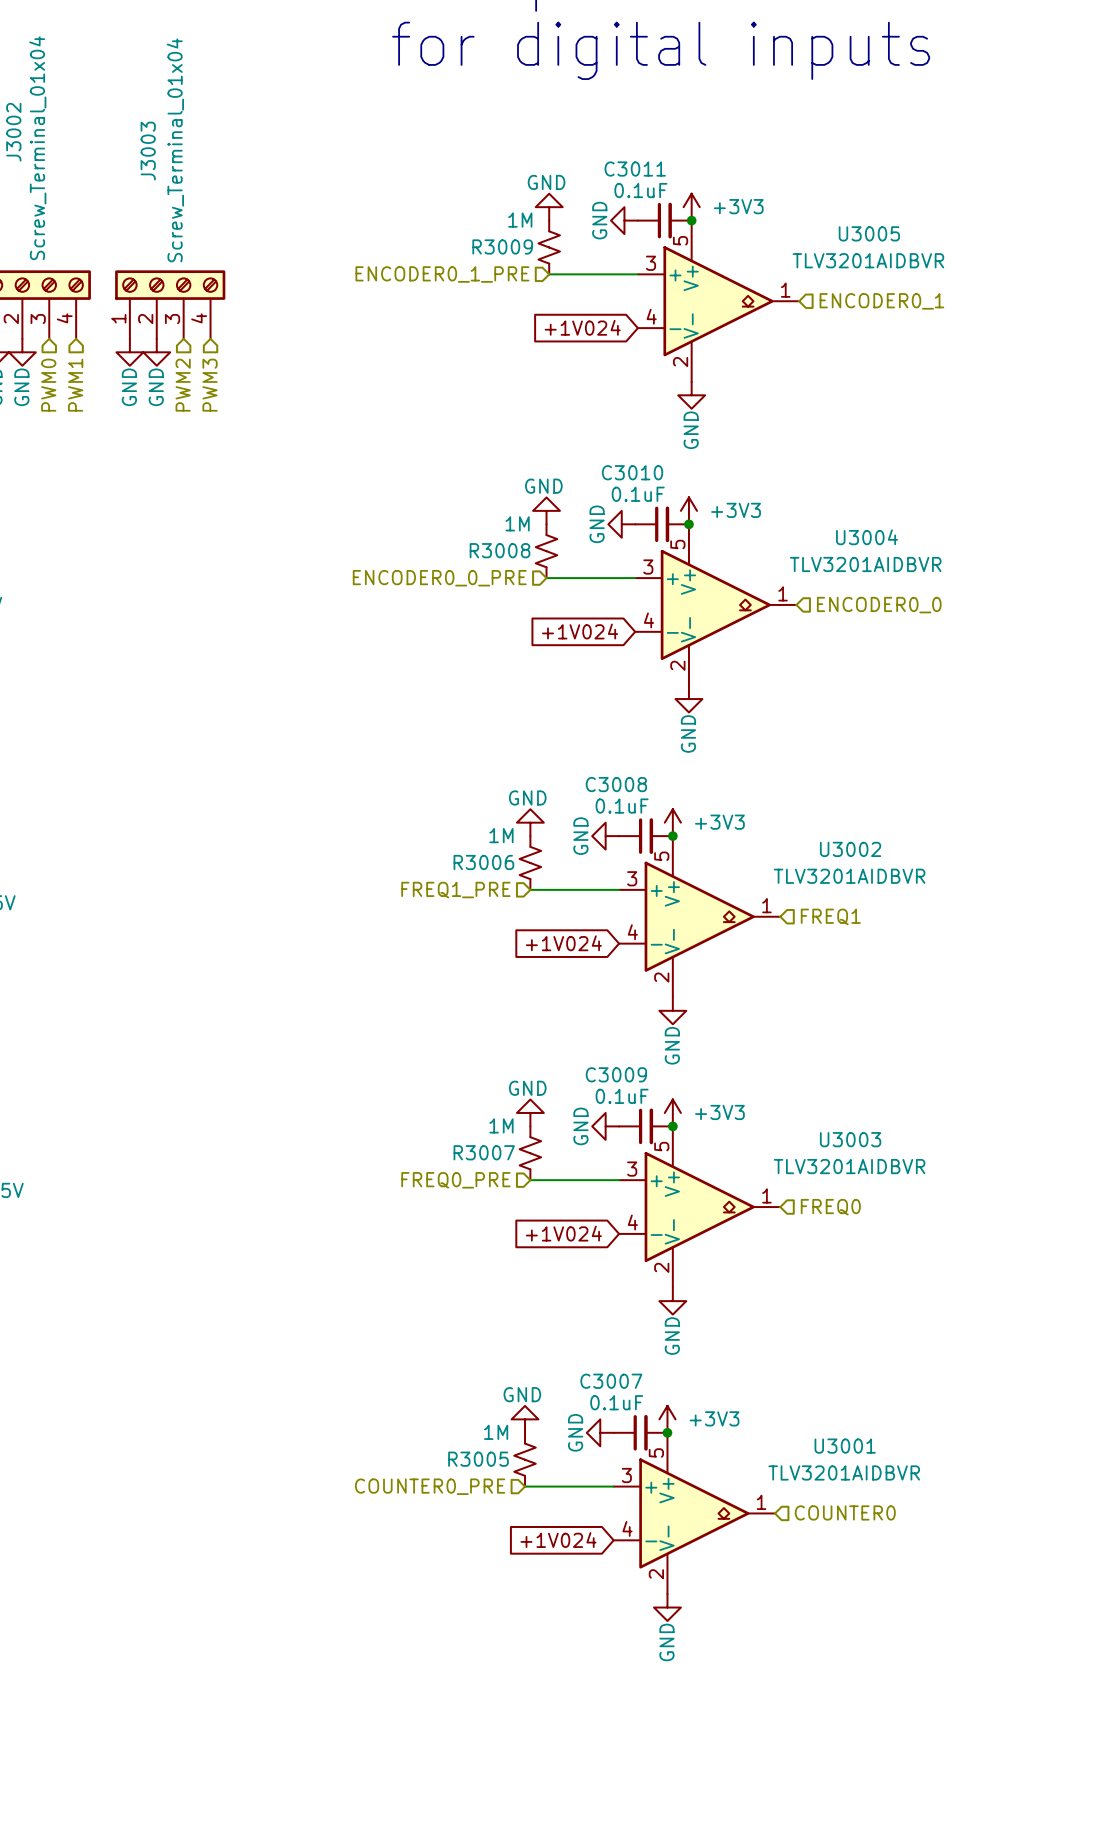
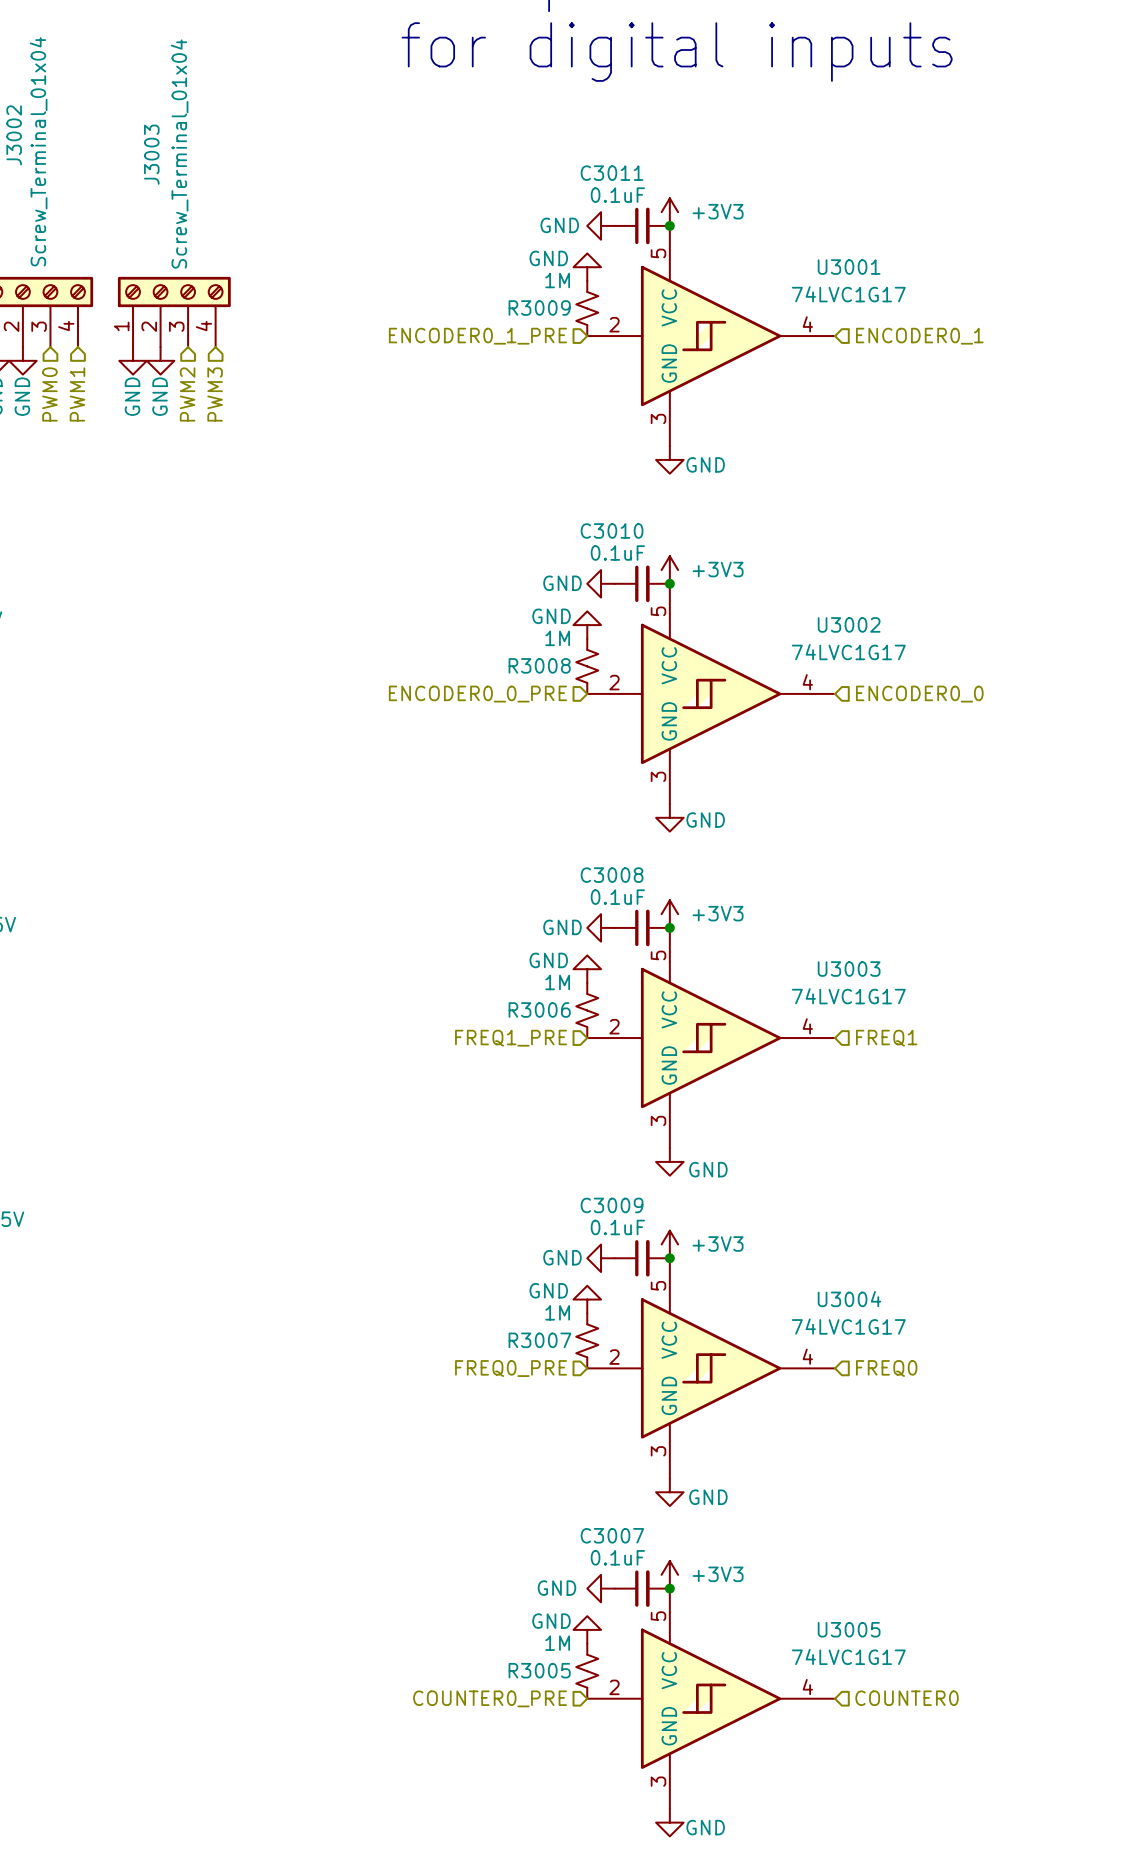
power symbol: GND (549, 207) -> none
power symbol position: +3V3 (691, 207) -> +3V3 (669, 212)
power symbol: none -> GND (601, 225)
power symbol: GND (624, 220) -> none
U3005 symbol: [637, 220, 800, 382] -> [587, 1588, 836, 1809]
C3011 position: (664, 220) -> (642, 225)
junction position: (691, 220) -> (669, 225)
R3009 position: (549, 247) -> (587, 308)
power symbol: none -> GND (587, 267)
U3005 value: TLV3201AIDBVR (868, 260) -> 74LVC1G17 (848, 1656)
hierarchical label position: ENCODER0_1_PRE (442, 274) -> ENCODER0_1_PRE (477, 336)
wire: (549, 274) (637, 274) -> none
hierarchical label position: ENCODER0_1 (881, 301) -> ENCODER0_1 (919, 336)
global label: +1V024 (582, 327) -> none
power symbol: GND (691, 395) -> none
power symbol: none -> GND (669, 459)
power symbol: GND (546, 510) -> none
power symbol position: +3V3 (688, 510) -> +3V3 (669, 570)
power symbol: GND (621, 524) -> none
U3004 symbol: [635, 524, 797, 686] -> [587, 1258, 836, 1479]
C3010 position: (662, 524) -> (642, 583)
junction position: (688, 524) -> (669, 583)
R3008 position: (546, 551) -> (587, 666)
U3004 value: TLV3201AIDBVR (865, 564) -> 74LVC1G17 (848, 1326)
power symbol: none -> GND (601, 583)
hierarchical label position: ENCODER0_0_PRE (439, 578) -> ENCODER0_0_PRE (477, 694)
wire: (546, 578) (635, 578) -> none
hierarchical label position: ENCODER0_0 (879, 605) -> ENCODER0_0 (919, 694)
power symbol: none -> GND (587, 625)
global label: +1V024 (579, 631) -> none
power symbol: GND (688, 699) -> none
power symbol: none -> GND (669, 817)
power symbol: GND (530, 822) -> none
power symbol position: +3V3 (672, 822) -> +3V3 (669, 914)
power symbol: GND (605, 836) -> none
U3002 symbol: [619, 836, 781, 998] -> [587, 583, 836, 805]
C3008 position: (645, 836) -> (642, 927)
junction: (672, 836) -> none
R3006 position: (530, 862) -> (587, 1010)
U3002 value: TLV3201AIDBVR (849, 876) -> 74LVC1G17 (848, 652)
wire: (530, 889) (619, 889) -> none
hierarchical label position: FREQ1_PRE (455, 890) -> FREQ1_PRE (511, 1038)
power symbol: none -> GND (601, 927)
junction: none -> (669, 927)
hierarchical label position: FREQ1 (830, 916) -> FREQ1 (886, 1038)
global label: +1V024 (563, 943) -> none
power symbol: none -> GND (587, 969)
power symbol: GND (672, 1010) -> none
power symbol: GND (530, 1112) -> none
power symbol: +3V3 (672, 1112) -> none
power symbol text position: GND (580, 1126) -> GND (708, 1169)
power symbol rotation: 0° (605, 1126) -> 90° counterclockwise (669, 1161)
power symbol position: GND (605, 1126) -> GND (669, 1161)
U3003 symbol: [619, 1126, 781, 1288] -> [587, 927, 836, 1149]
C3009 position: (645, 1126) -> (642, 1258)
junction: (672, 1126) -> none
R3007 position: (530, 1153) -> (587, 1340)
U3003 value: TLV3201AIDBVR (849, 1166) -> 74LVC1G17 (848, 996)
hierarchical label position: FREQ0_PRE (455, 1180) -> FREQ0_PRE (511, 1368)
wire: (530, 1180) (619, 1180) -> none
hierarchical label position: FREQ0 (830, 1207) -> FREQ0 (886, 1368)
power symbol: none -> +3V3 (669, 1244)
power symbol: none -> GND (601, 1258)
junction: none -> (669, 1258)
global label: +1V024 (563, 1233) -> none
power symbol: none -> GND (587, 1299)
power symbol: GND (672, 1301) -> none
power symbol: GND (525, 1419) -> none
power symbol: +3V3 (667, 1419) -> none
power symbol text position: GND (575, 1432) -> GND (708, 1497)
power symbol rotation: 0° (600, 1432) -> 90° counterclockwise (669, 1492)
power symbol position: GND (600, 1432) -> GND (669, 1492)
U3001 symbol: [613, 1432, 775, 1595] -> [587, 225, 836, 447]
C3007 position: (640, 1432) -> (642, 1588)
junction: (667, 1432) -> none
R3005 position: (525, 1459) -> (587, 1671)
U3001 value: TLV3201AIDBVR (844, 1472) -> 74LVC1G17 (848, 294)
hierarchical label position: COUNTER0_PRE (430, 1486) -> COUNTER0_PRE (490, 1698)
wire: (525, 1486) (613, 1486) -> none
hierarchical label position: COUNTER0 (845, 1512) -> COUNTER0 (907, 1698)
power symbol: none -> +3V3 (669, 1574)
global label: +1V024 (558, 1540) -> none
power symbol: none -> GND (601, 1588)
junction: none -> (669, 1588)
power symbol: none -> GND (587, 1629)
power symbol: GND (667, 1607) -> none
power symbol: none -> GND (669, 1822)

